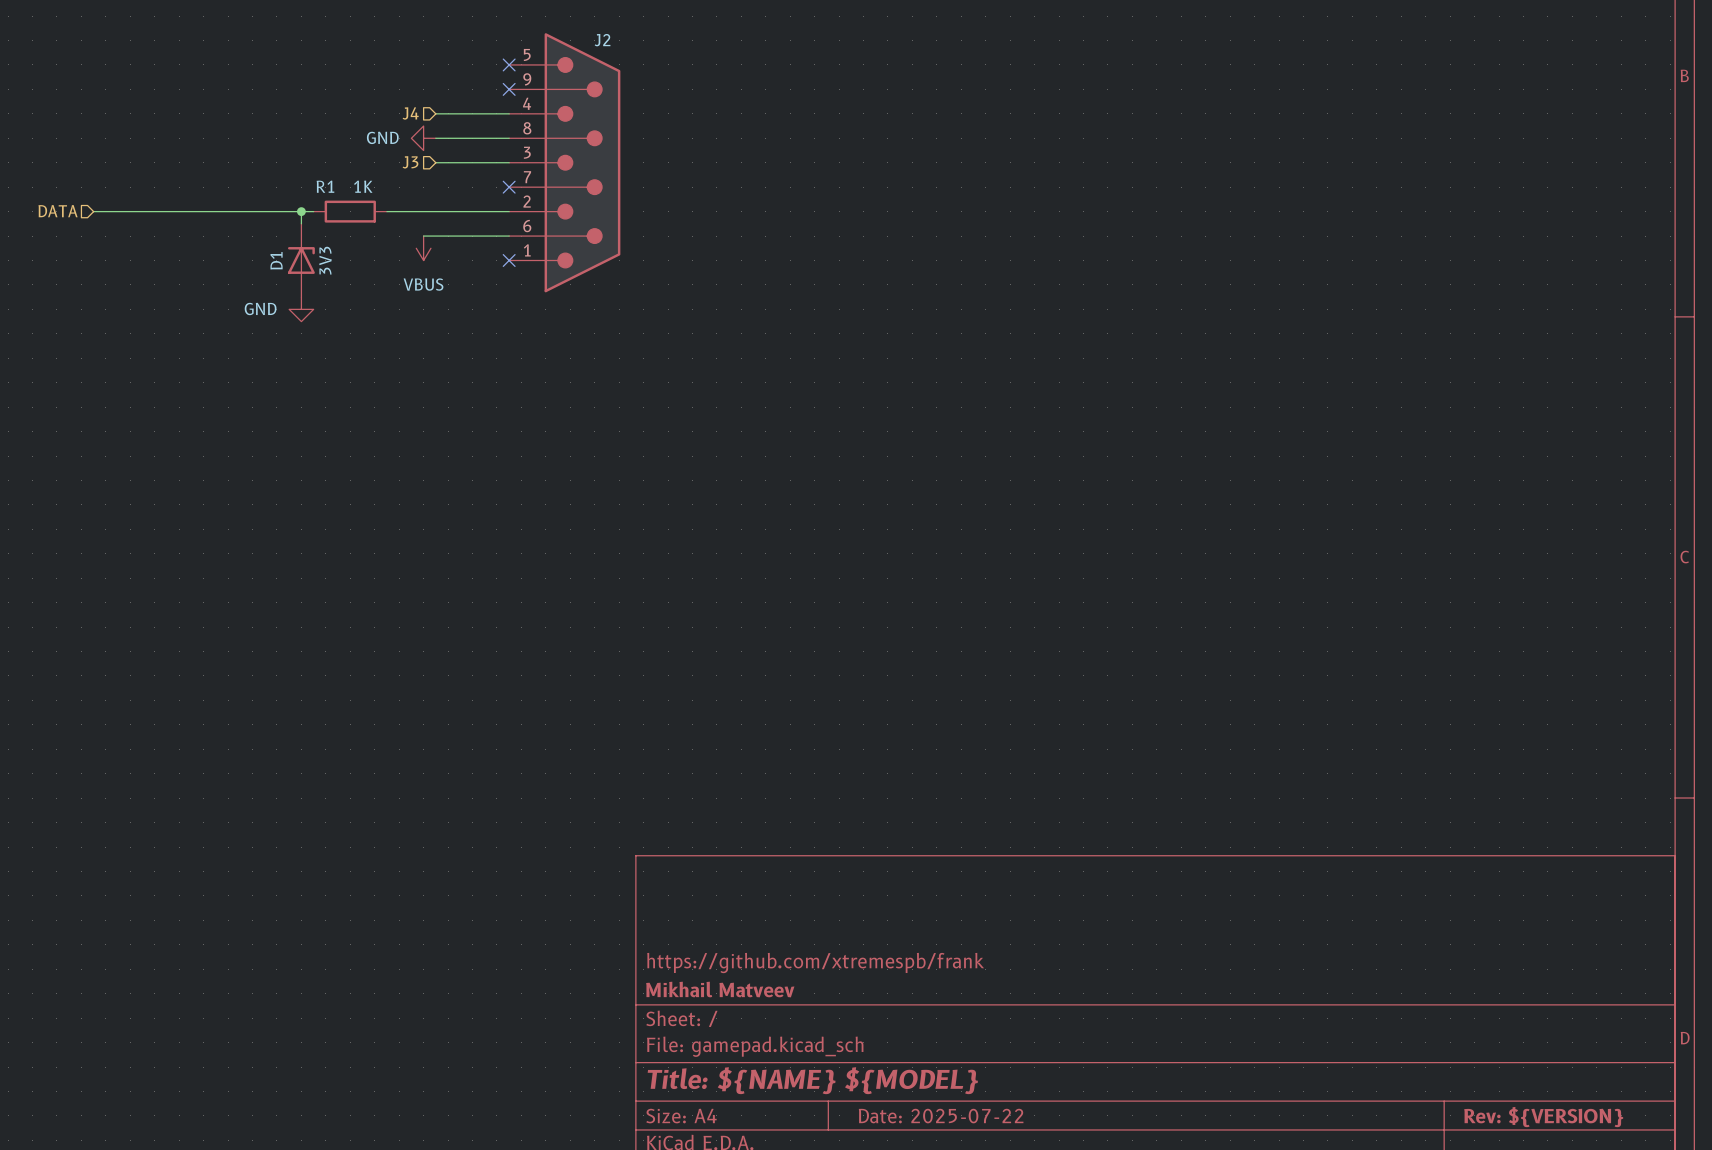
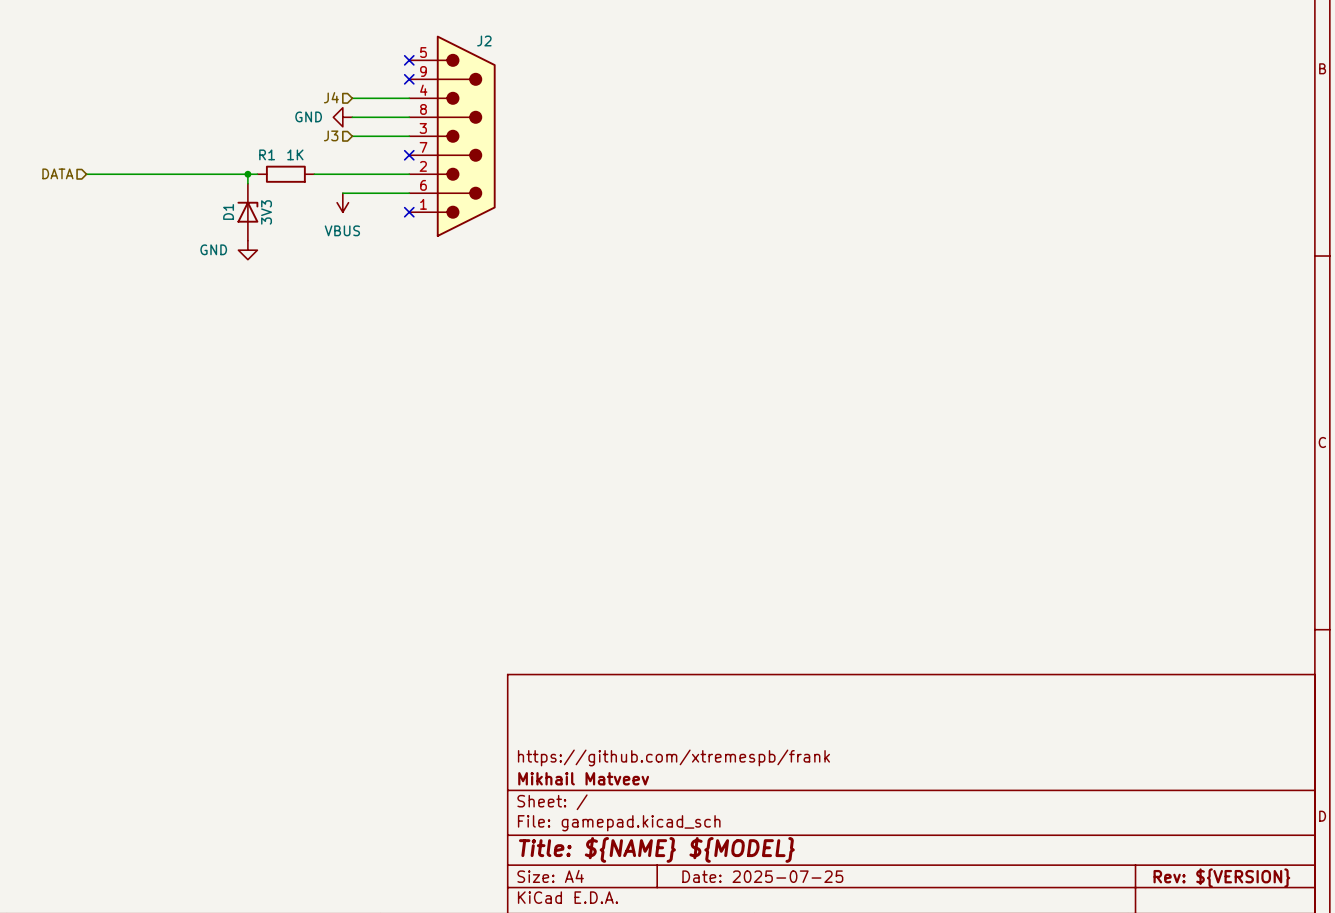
title block: Date: 2025-07-22 (941, 1116) -> Date: 2025-07-25 (762, 876)

